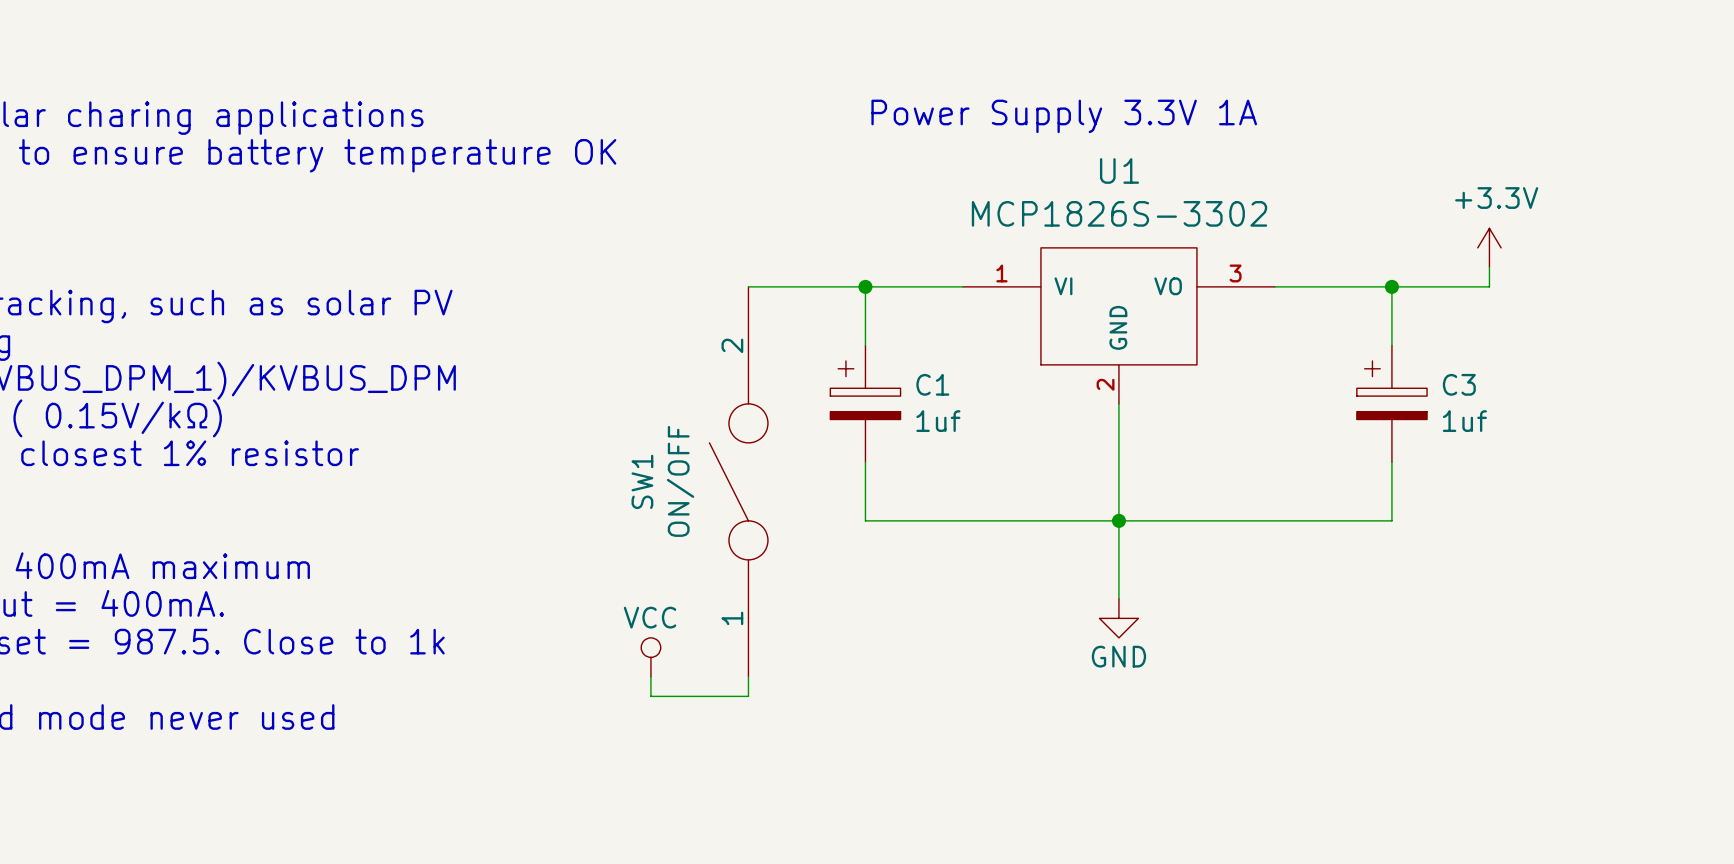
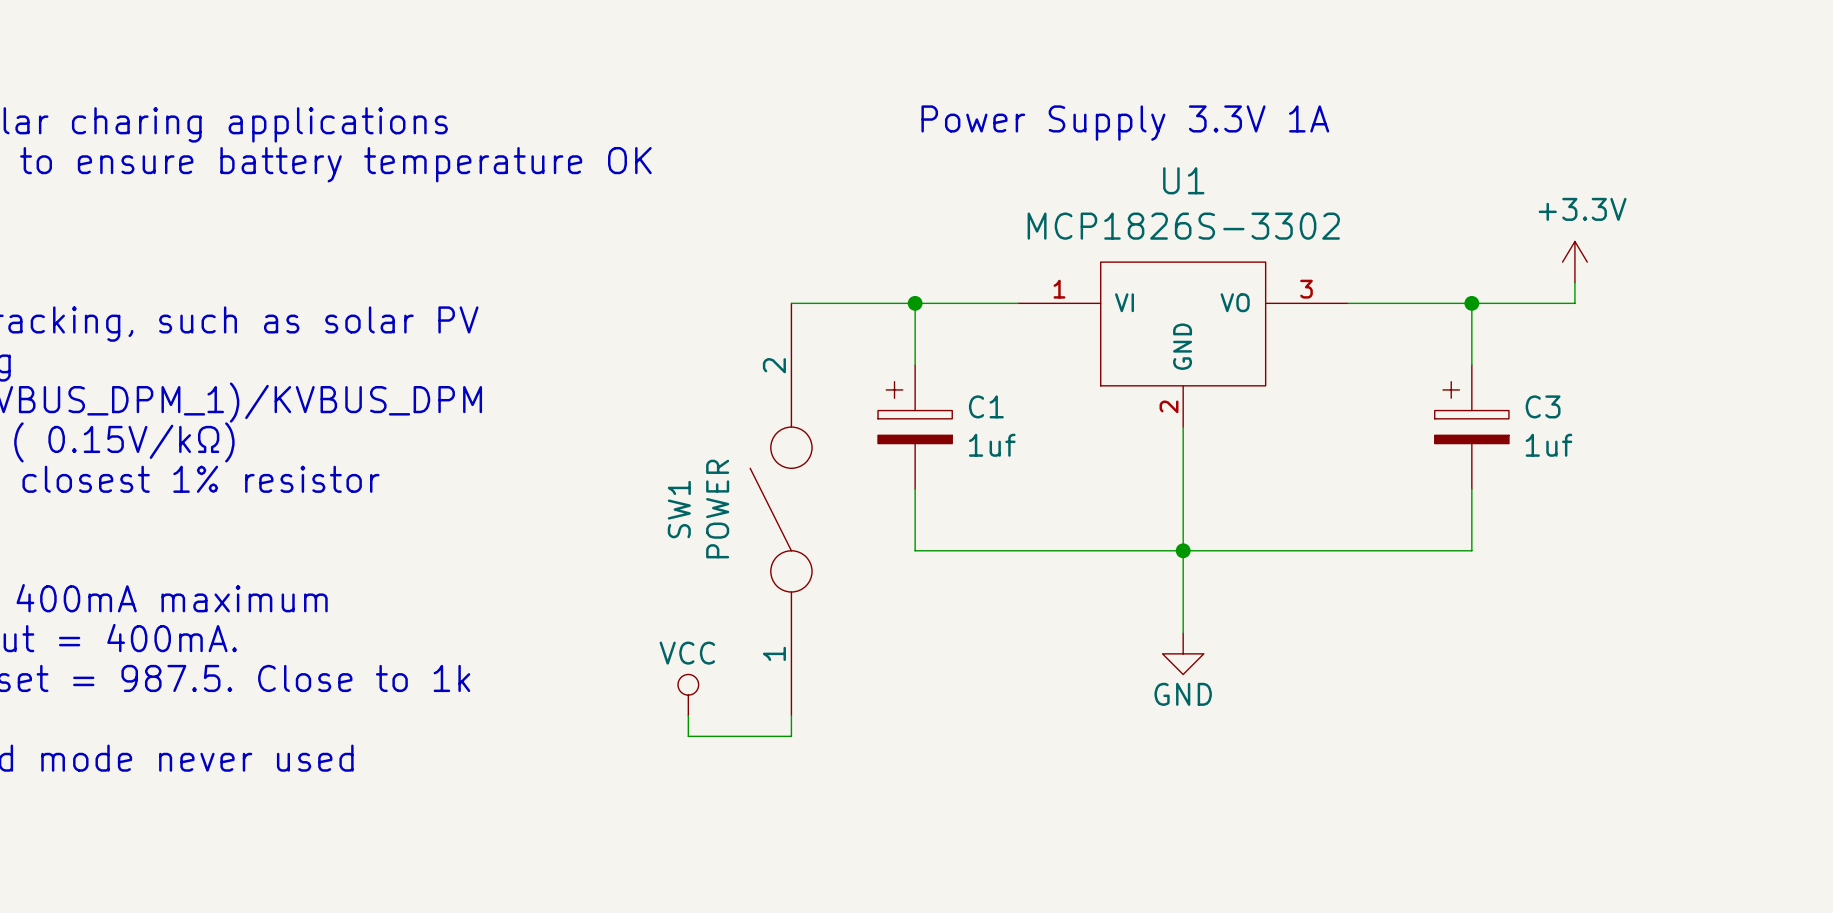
SW1 value: ON/OFF (680, 481) -> POWER (717, 509)

